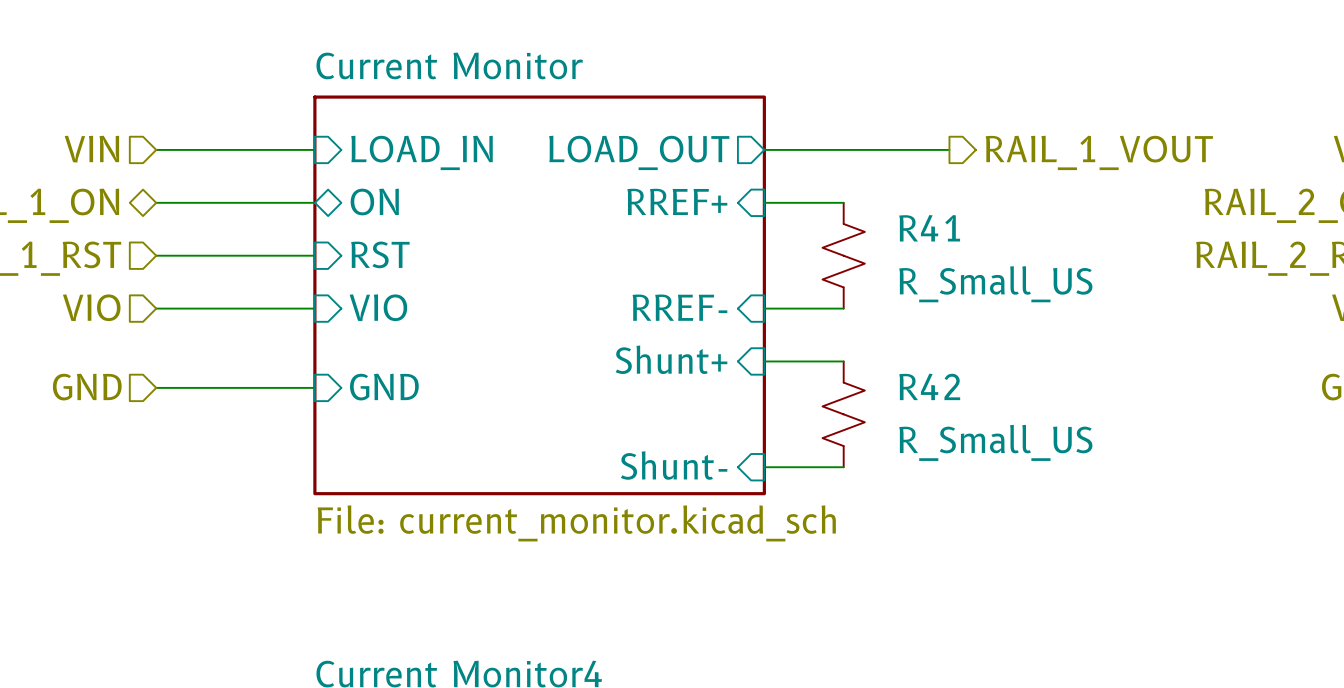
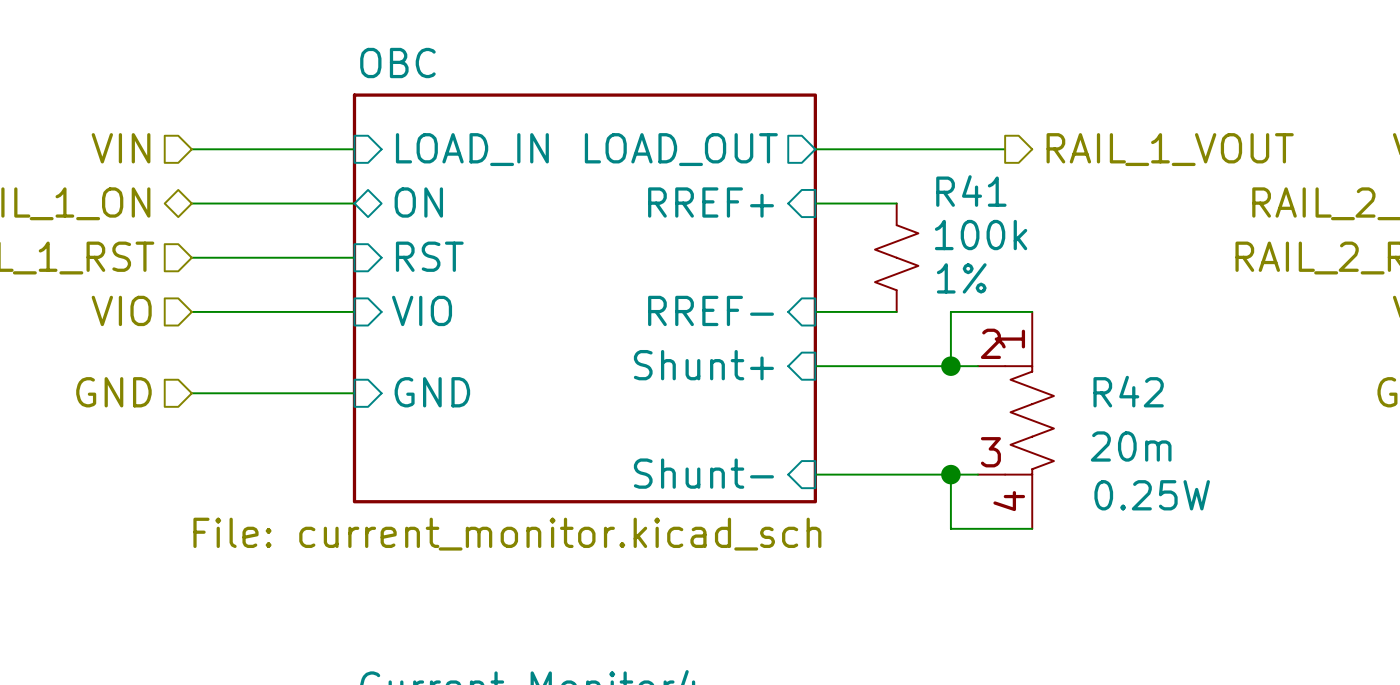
sheet Current Monitor name: Current Monitor (449, 65) -> OBC (397, 63)
R41 name position: R41 (929, 228) -> R41 (971, 191)
R41 text: none -> 1% (961, 278)
R41 value: R_Small_US (995, 284) -> 100k (981, 235)
wire: none -> (1032, 311) (950, 311) (950, 366)
R42 symbol: [822, 361, 865, 468] -> [978, 311, 1054, 529]
wire: none -> (896, 366) (978, 366)
junction: none -> (950, 366)
R42 value: R_Small_US (995, 442) -> 20m (1131, 446)
wire: none -> (896, 474) (978, 474)
wire: none -> (950, 474) (950, 528) (1032, 528)
junction: none -> (950, 474)
R42 text: none -> 0.25W (1152, 495)
sheet Current Monitor value position: File: current_monitor.kicad_sch (576, 523) -> File: current_monitor.kicad_sch (507, 534)

